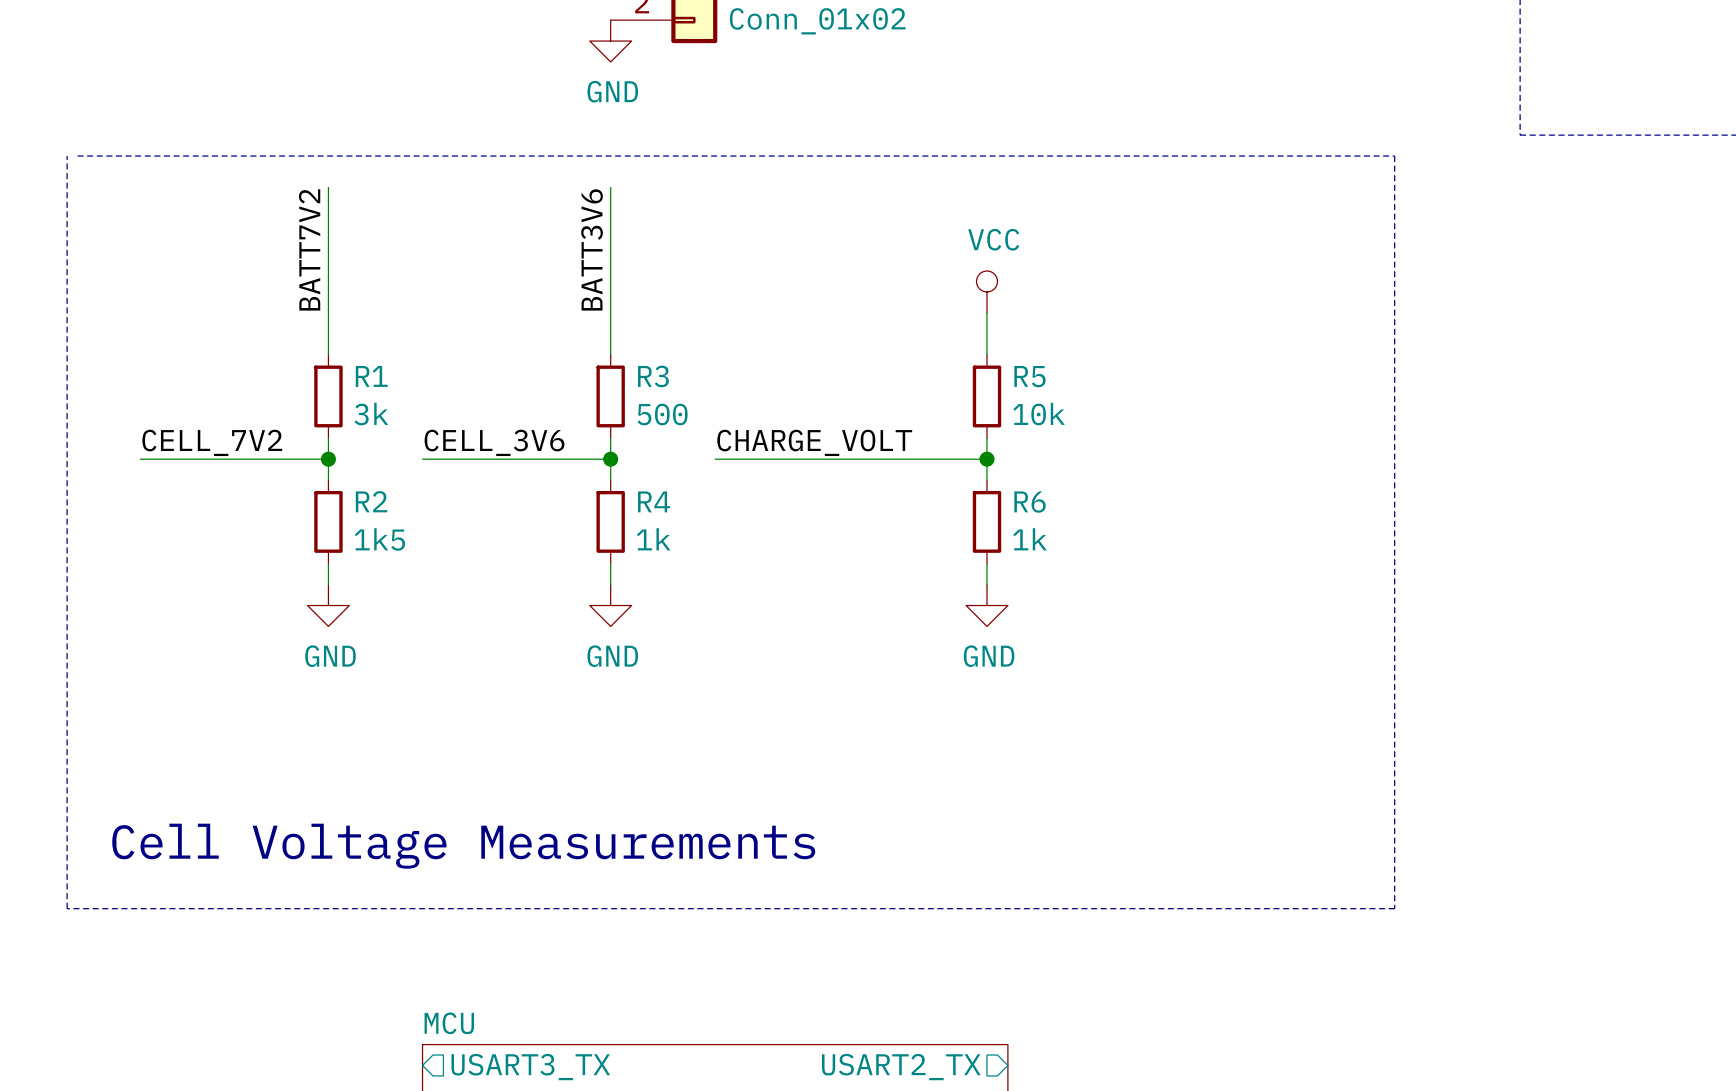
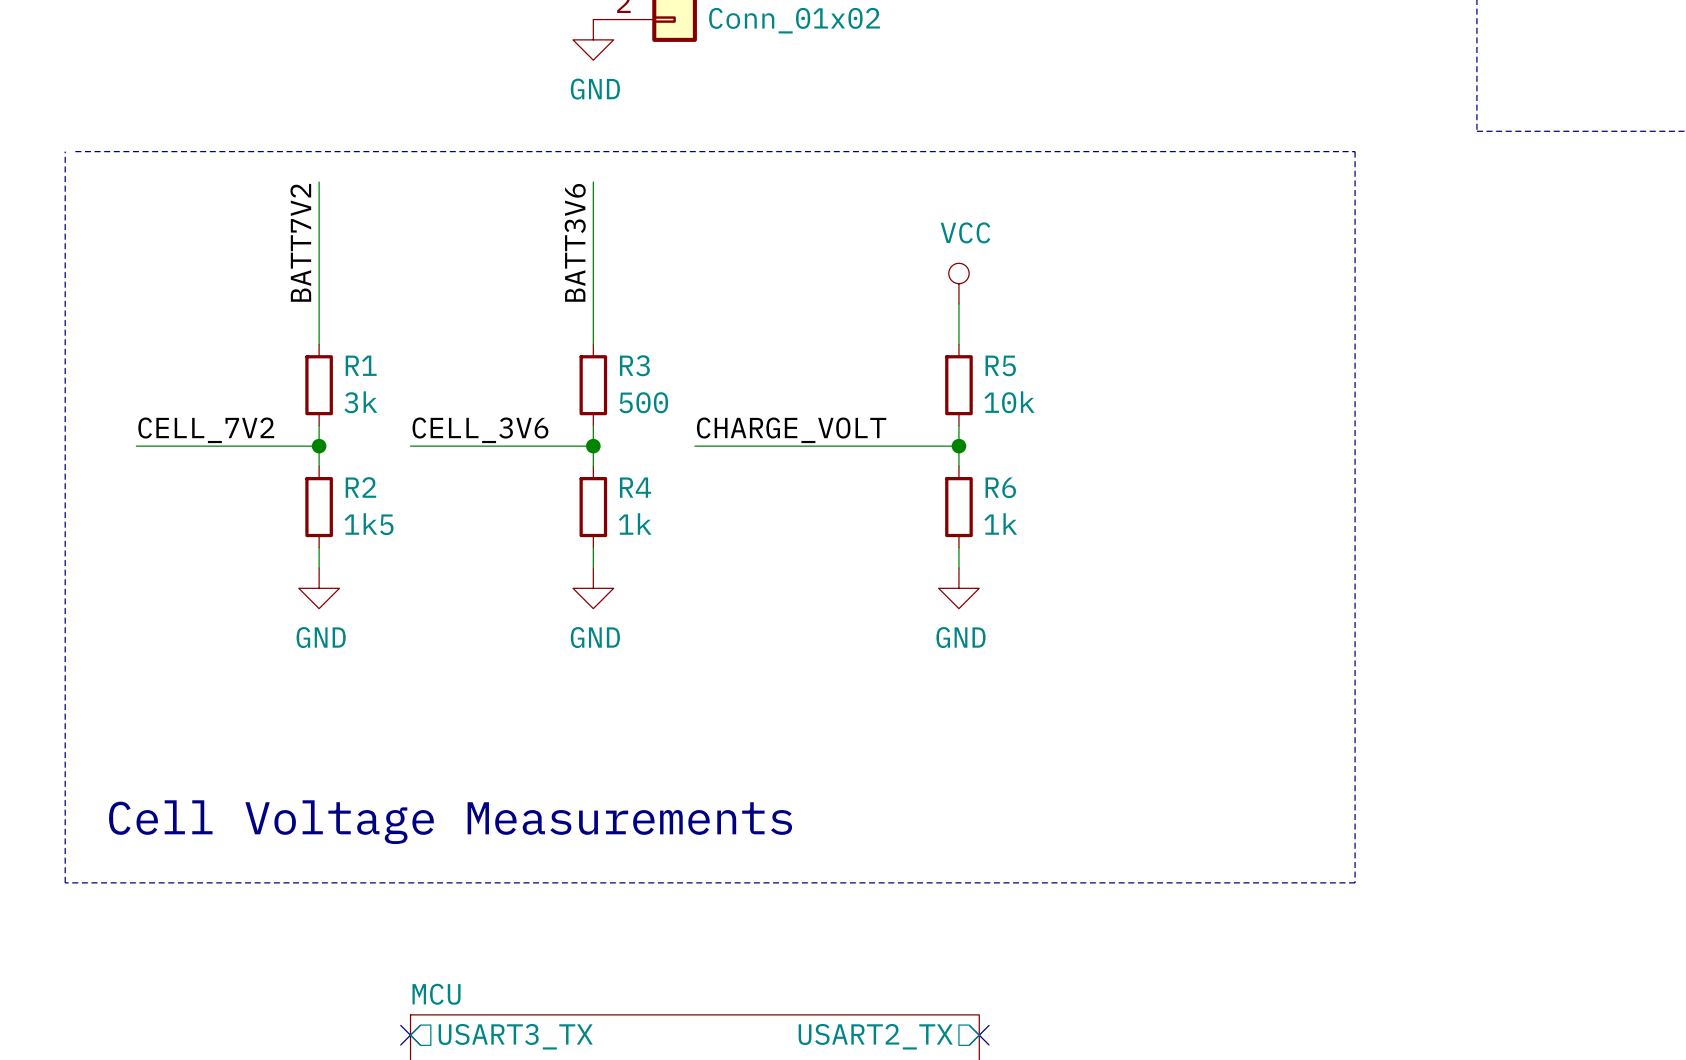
no-connect mark: none -> (410, 1035)
no-connect mark: none -> (979, 1035)

